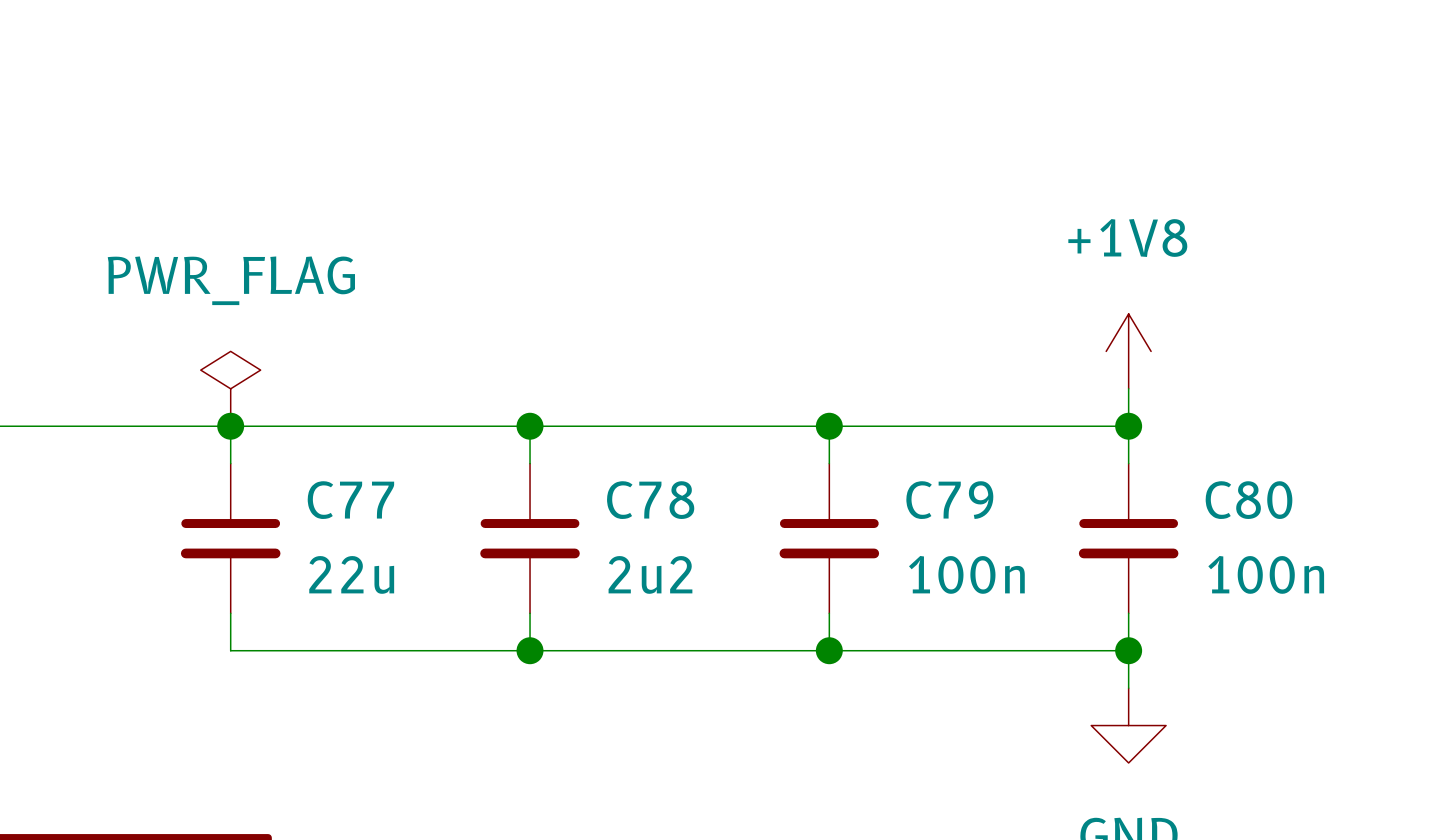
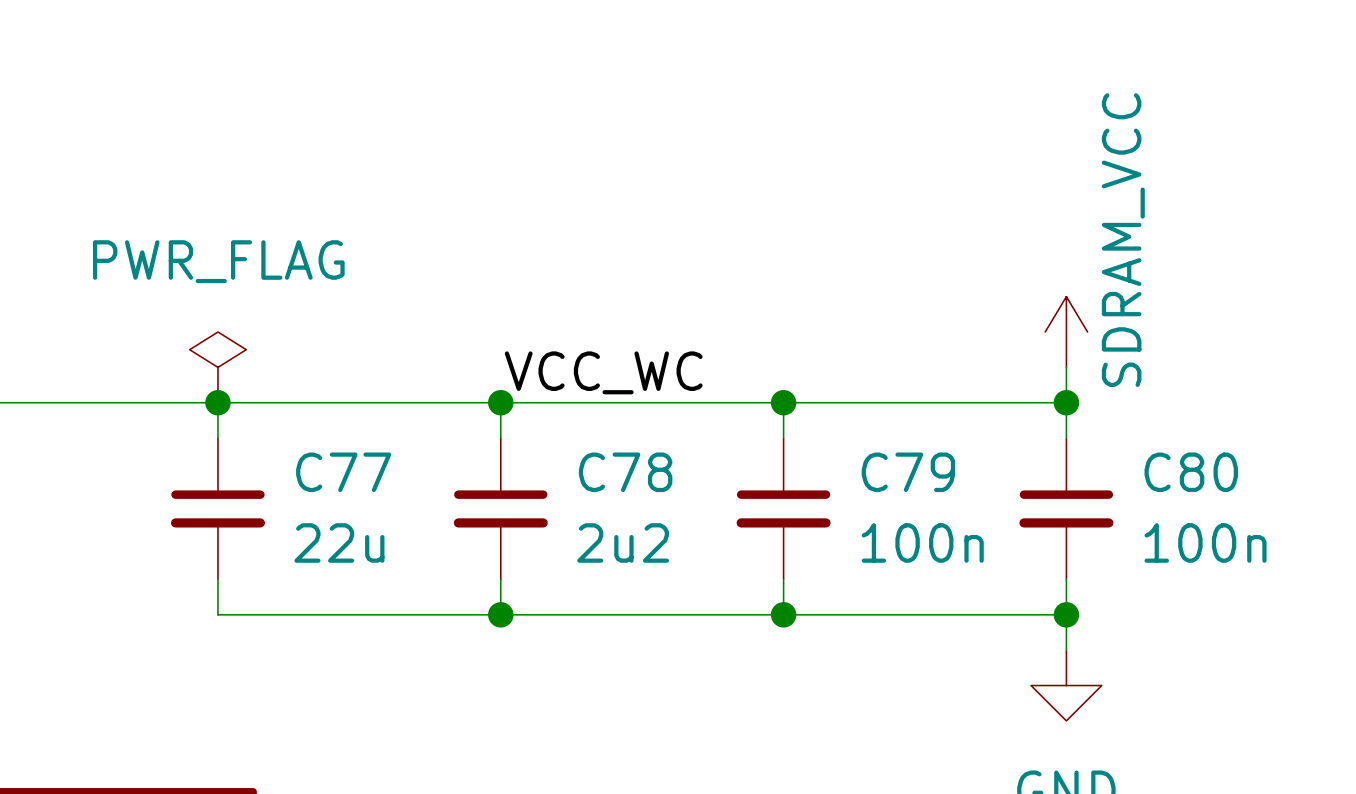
power symbol: +1V8 (1128, 351) -> SDRAM_VCC (1066, 332)
label: none -> VCC_WC (603, 372)

